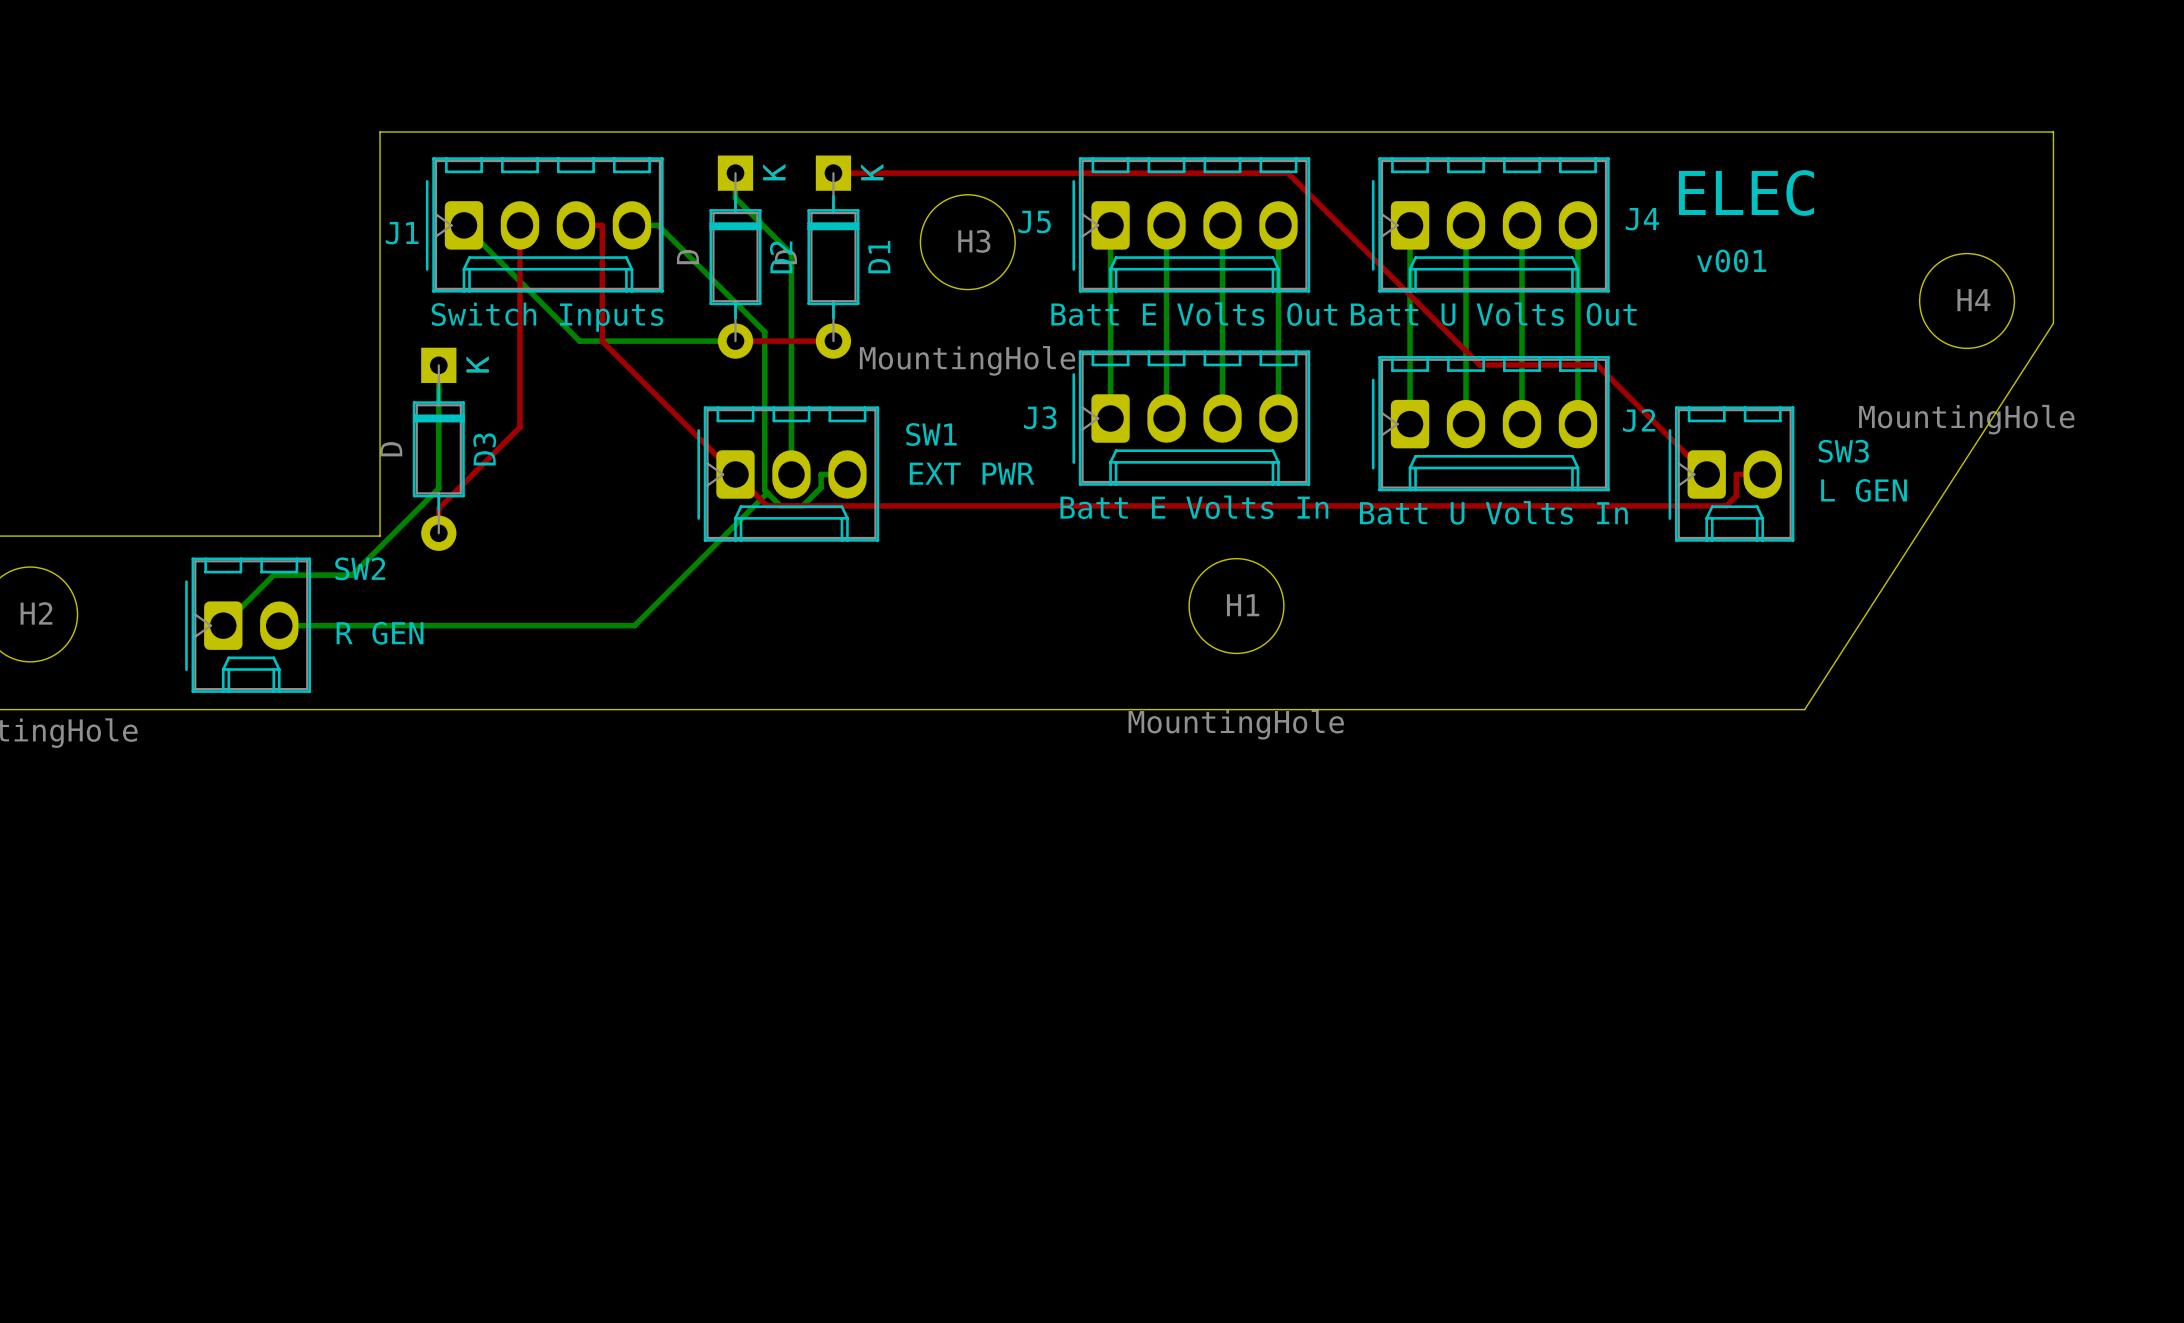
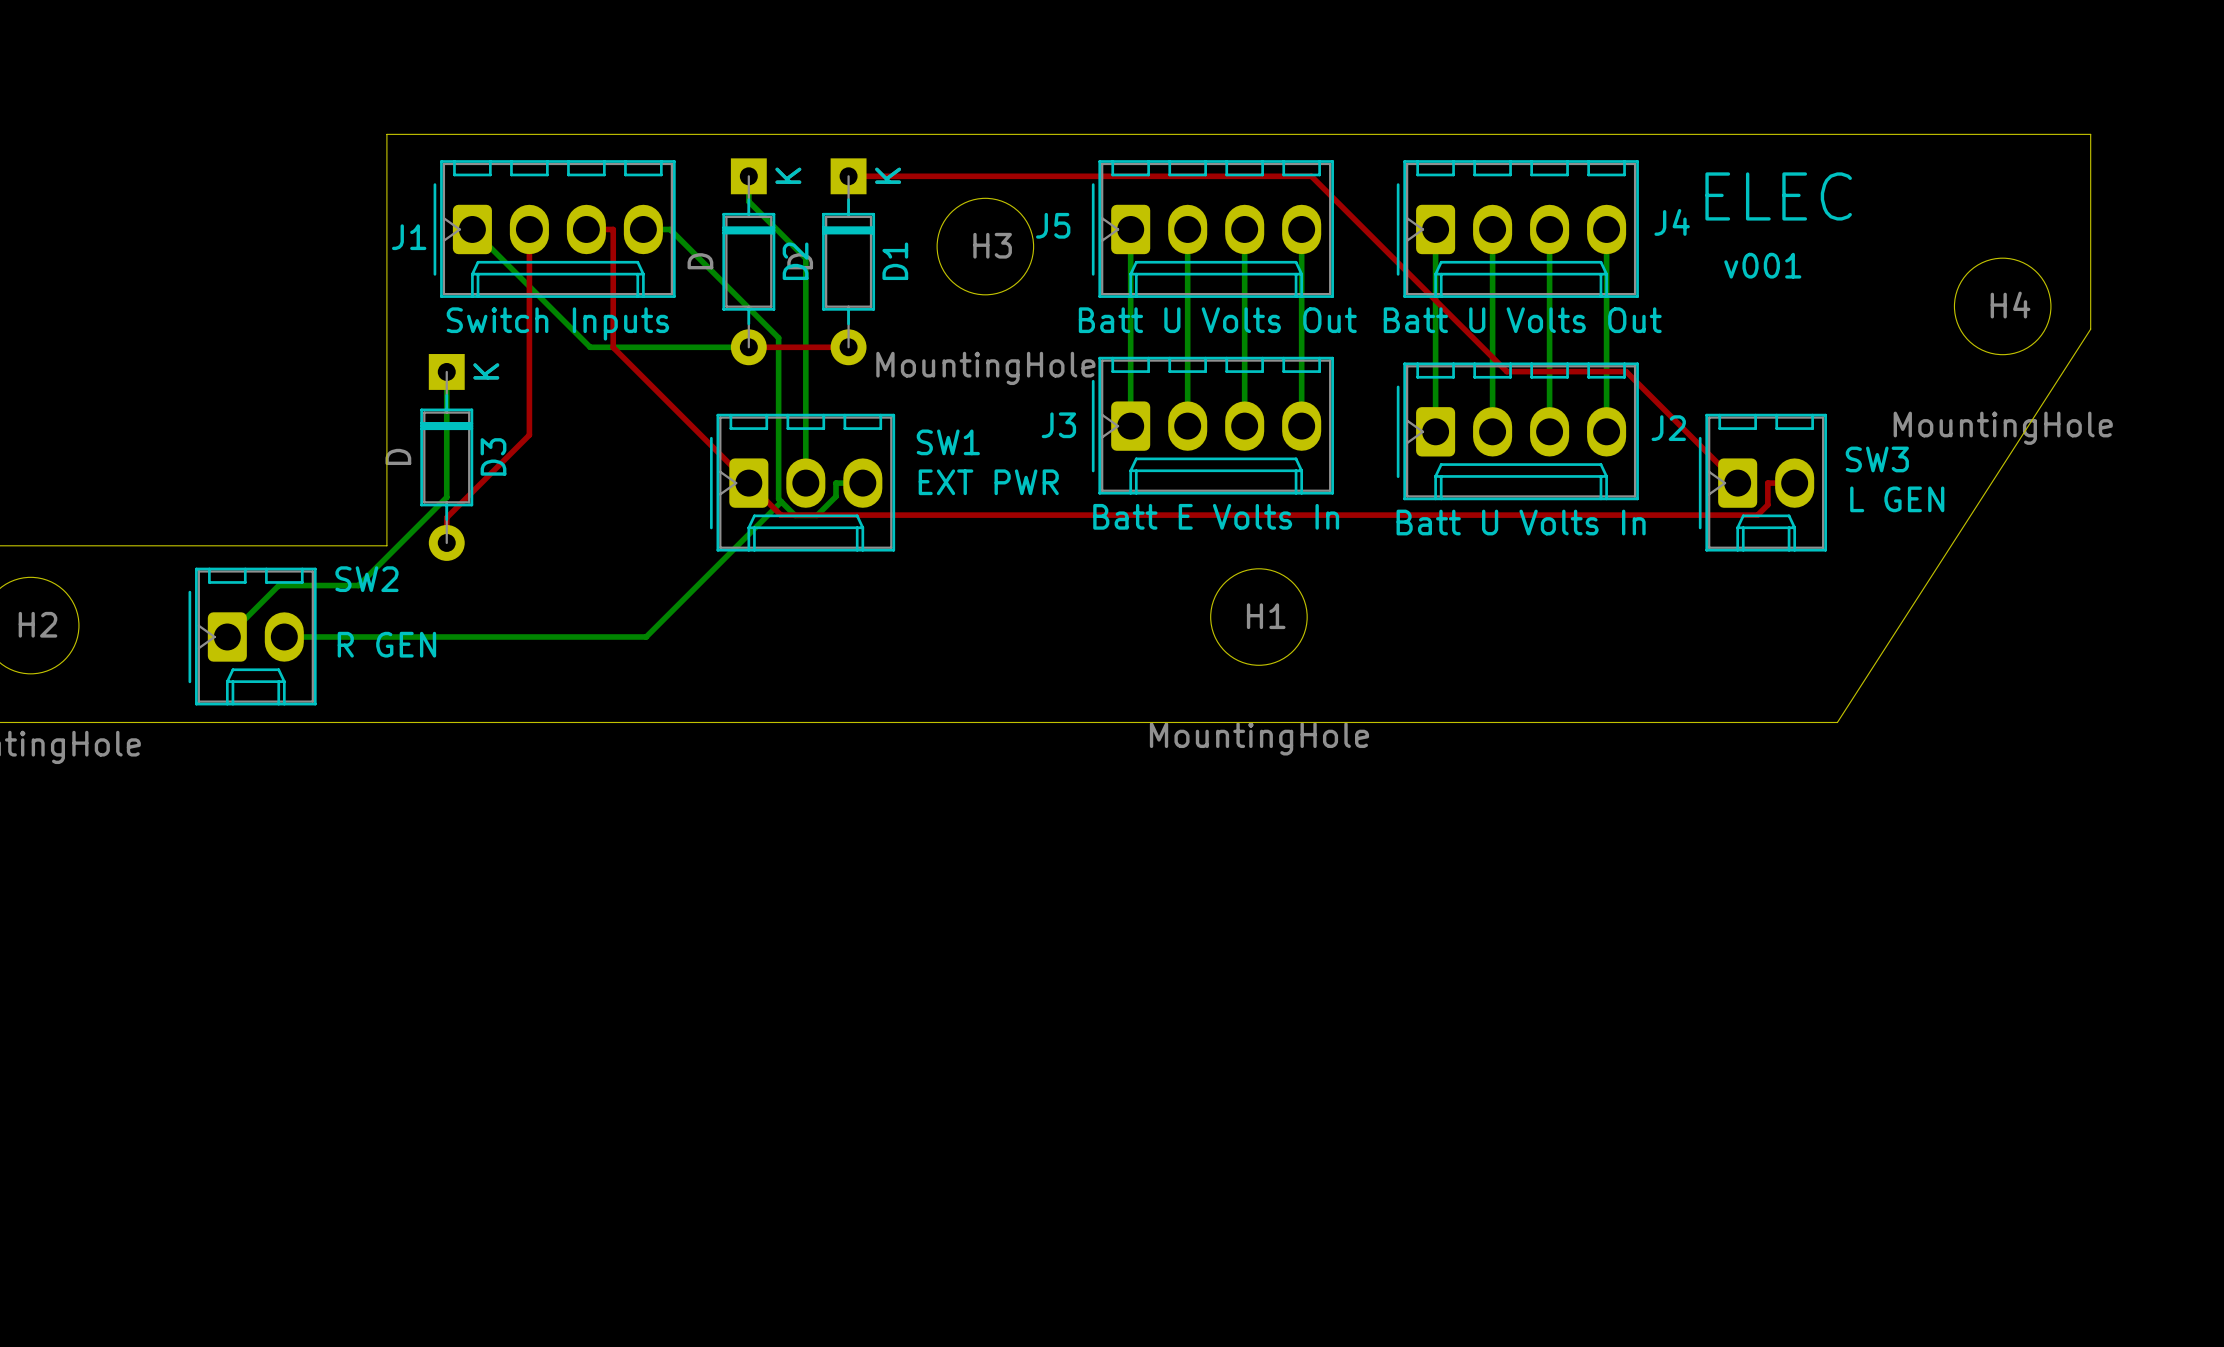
J5 value: Batt E Volts Out (1194, 314) -> Batt U Volts Out (1217, 320)

